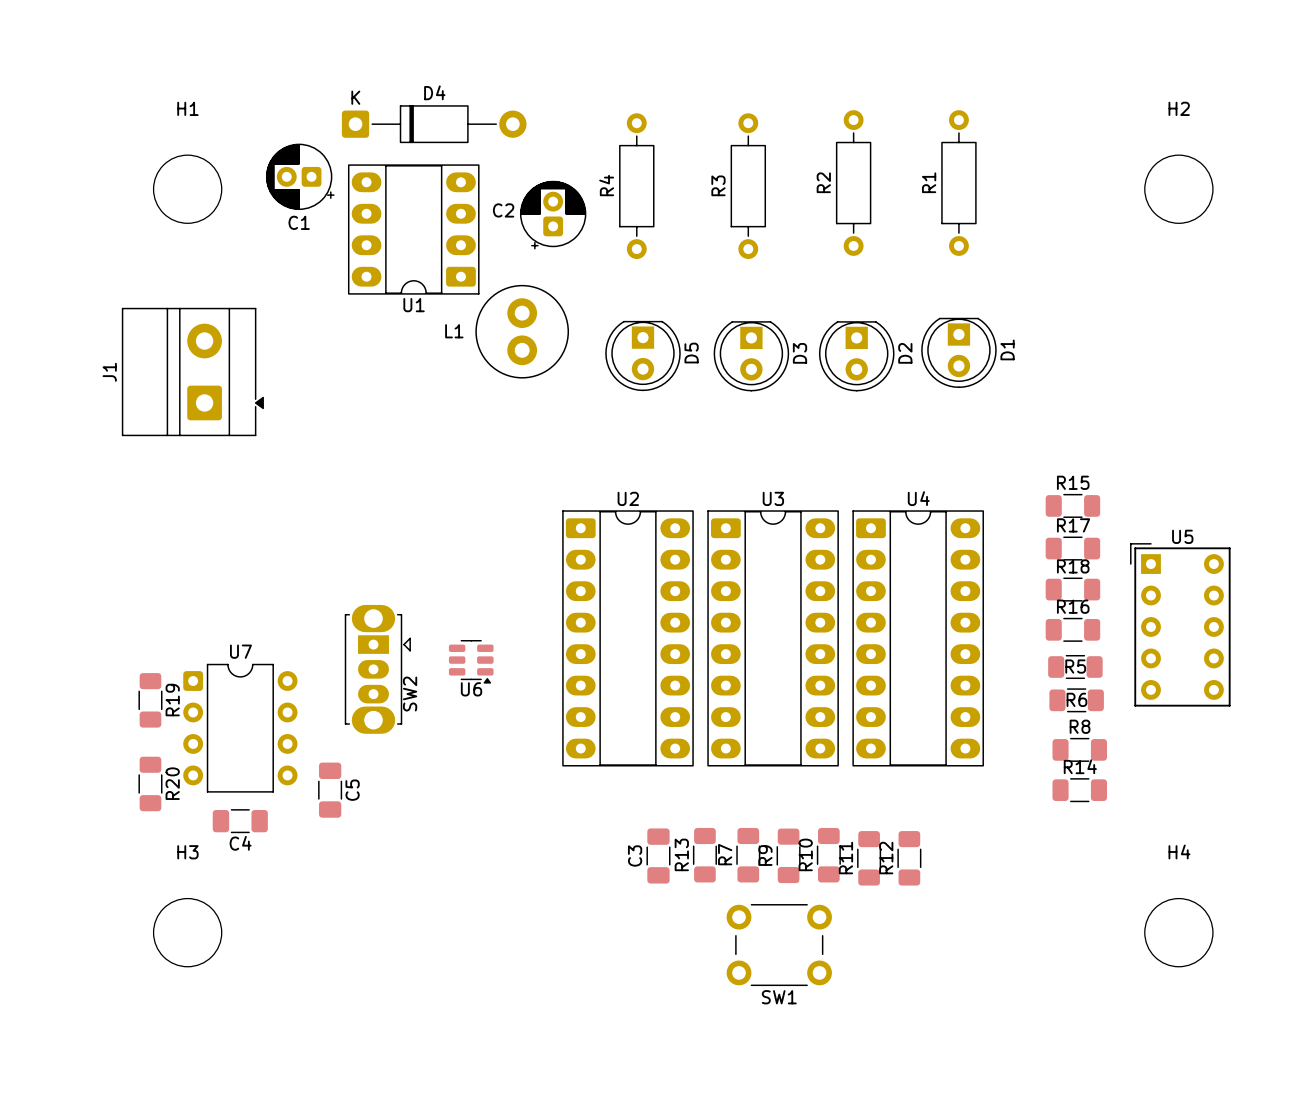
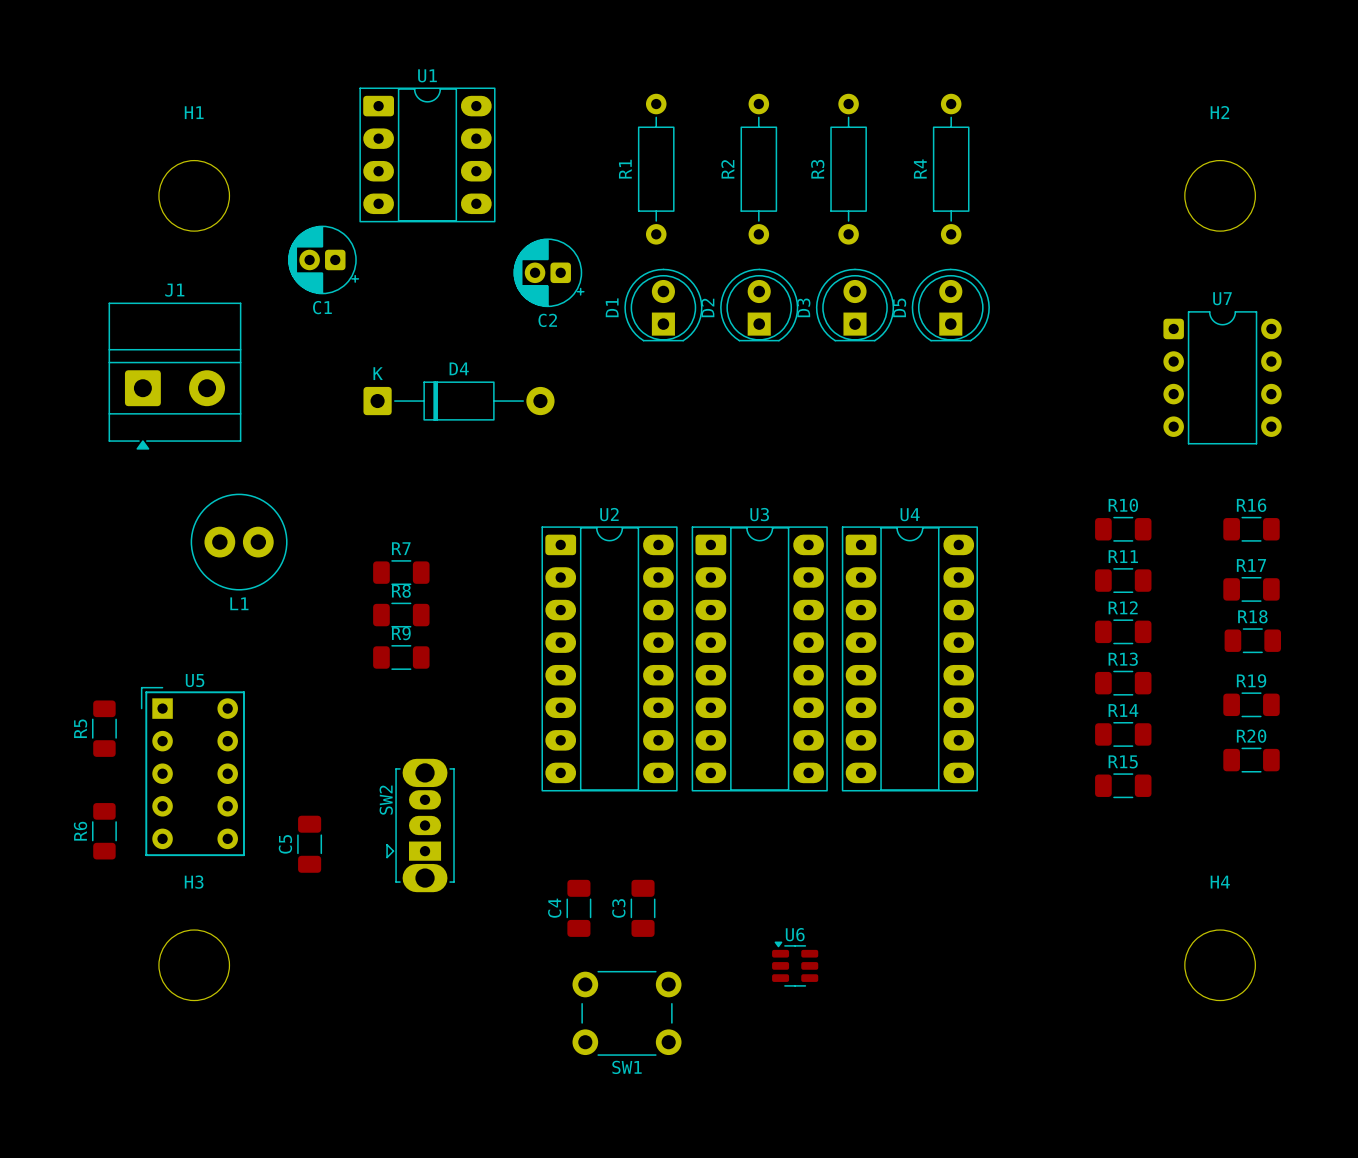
D4 position: (434, 124) -> (459, 401)
C1 position: (300, 176) -> (323, 259)
R2 position: (853, 183) -> (758, 169)
R1 position: (958, 183) -> (656, 169)
R4 position: (636, 186) -> (951, 169)
R3 position: (748, 186) -> (848, 169)
C2 rotation: 0° (553, 215) -> 90° counterclockwise (549, 272)
C2 position: (553, 215) -> (549, 272)
U1 rotation: 0° (413, 229) -> 180° (427, 154)
U1 position: (413, 229) -> (427, 154)
L1 name position: L1 (454, 331) -> L1 (239, 603)
L1 rotation: 0° (522, 331) -> 90° clockwise (239, 542)
L1 position: (522, 331) -> (239, 542)
D1 rotation: 0° (958, 352) -> 180° (663, 305)
D1 position: (958, 352) -> (663, 305)
D5 rotation: 0° (642, 356) -> 180° (950, 305)
D5 position: (642, 356) -> (950, 305)
D3 rotation: 0° (751, 356) -> 180° (855, 305)
D3 position: (751, 356) -> (855, 305)
D2 rotation: 0° (856, 356) -> 180° (759, 305)
D2 position: (856, 356) -> (759, 305)
J1 rotation: 0° (192, 371) -> 90° clockwise (174, 376)
R15 position: (1072, 505) -> (1123, 785)
R17 position: (1072, 548) -> (1251, 589)
R18 position: (1072, 589) -> (1252, 640)
U5 position: (1180, 624) -> (192, 771)
R16 position: (1072, 629) -> (1251, 529)
U2 position: (627, 638) -> (609, 658)
U3 position: (773, 638) -> (759, 658)
U4 position: (918, 638) -> (909, 658)
U6 rotation: 0° (471, 661) -> 180° (795, 964)
U6 position: (471, 661) -> (795, 964)
R5 rotation: 0° (1075, 667) -> 90° clockwise (104, 728)
R5 position: (1075, 667) -> (104, 728)
SW2 rotation: 0° (377, 669) -> 180° (420, 825)
SW2 position: (377, 669) -> (420, 825)
R19 rotation: 0° (150, 700) -> 90° clockwise (1251, 704)
R19 position: (150, 700) -> (1251, 704)
R19 name position: R19 (172, 700) -> R19 (1251, 680)
R6 rotation: 0° (1076, 700) -> 90° clockwise (104, 831)
R6 position: (1076, 700) -> (104, 831)
U7 position: (240, 728) -> (1222, 377)
R8 position: (1079, 749) -> (401, 615)
R20 rotation: 0° (150, 783) -> 90° clockwise (1251, 760)
R20 position: (150, 783) -> (1251, 760)
R20 name position: R20 (172, 783) -> R20 (1251, 736)
C5 position: (330, 790) -> (309, 844)
C5 name position: C5 (352, 790) -> C5 (285, 844)
R14 position: (1079, 790) -> (1123, 734)
C4 rotation: 0° (240, 821) -> 90° clockwise (578, 908)
C4 position: (240, 821) -> (578, 908)
C3 position: (658, 855) -> (643, 908)
R13 rotation: 0° (704, 855) -> 90° clockwise (1123, 683)
R13 position: (704, 855) -> (1123, 683)
R7 rotation: 0° (748, 855) -> 90° clockwise (401, 572)
R7 position: (748, 855) -> (401, 572)
R9 rotation: 0° (788, 855) -> 90° clockwise (401, 657)
R9 position: (788, 855) -> (401, 657)
R10 rotation: 0° (828, 855) -> 90° clockwise (1123, 529)
R10 position: (828, 855) -> (1123, 529)
R11 rotation: 0° (869, 858) -> 90° clockwise (1123, 580)
R11 position: (869, 858) -> (1123, 580)
R12 rotation: 0° (909, 858) -> 90° clockwise (1123, 631)
R12 position: (909, 858) -> (1123, 631)
SW1 position: (779, 945) -> (627, 1013)

